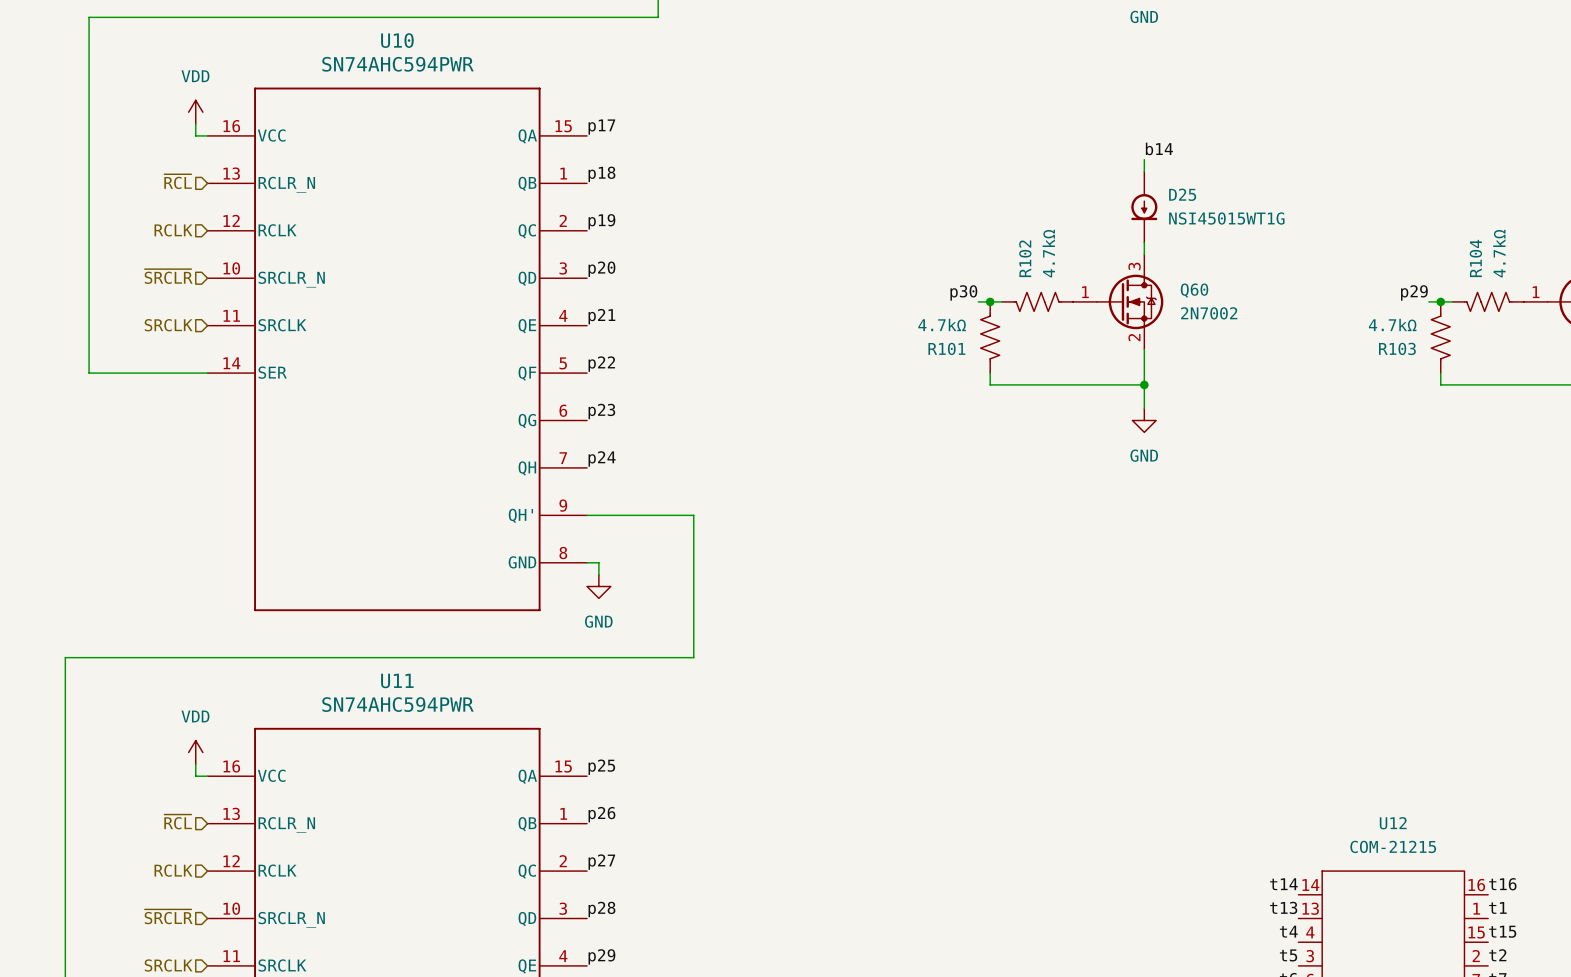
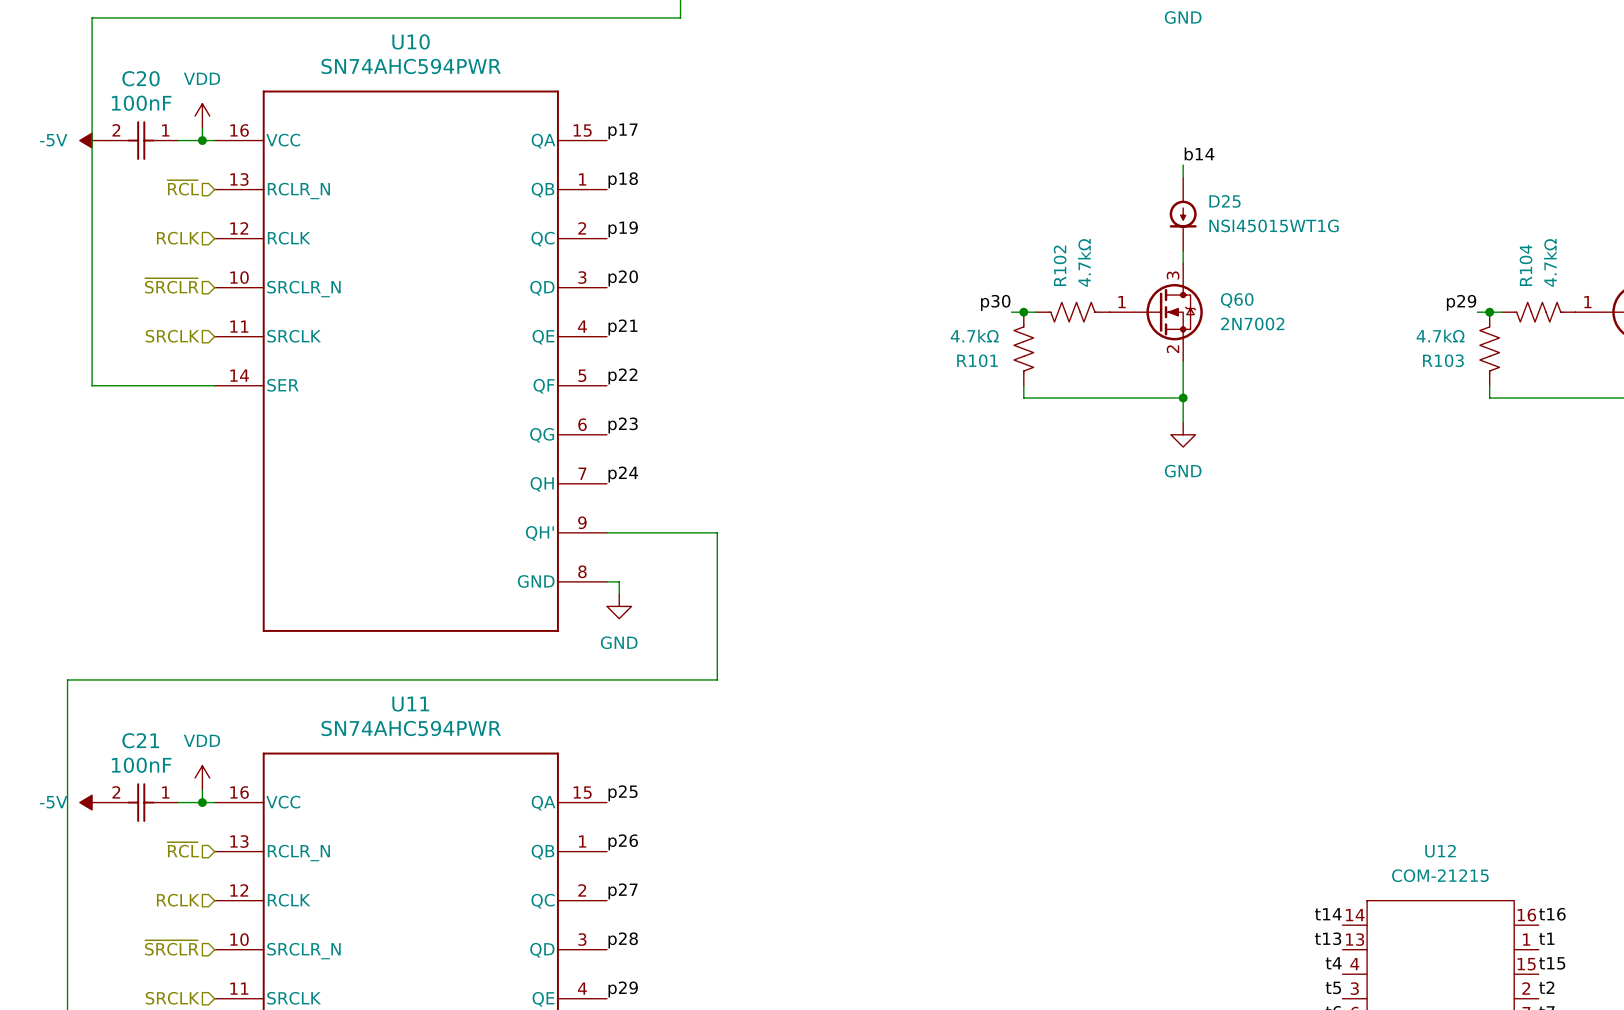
power symbol: none -> -5V (92, 140)
C20: none -> 100nF (141, 140)
wire: none -> (177, 140) (202, 140)
junction: none -> (202, 140)
power symbol: none -> -5V (92, 802)
C21: none -> 100nF (141, 802)
wire: none -> (177, 802) (202, 802)
junction: none -> (202, 802)

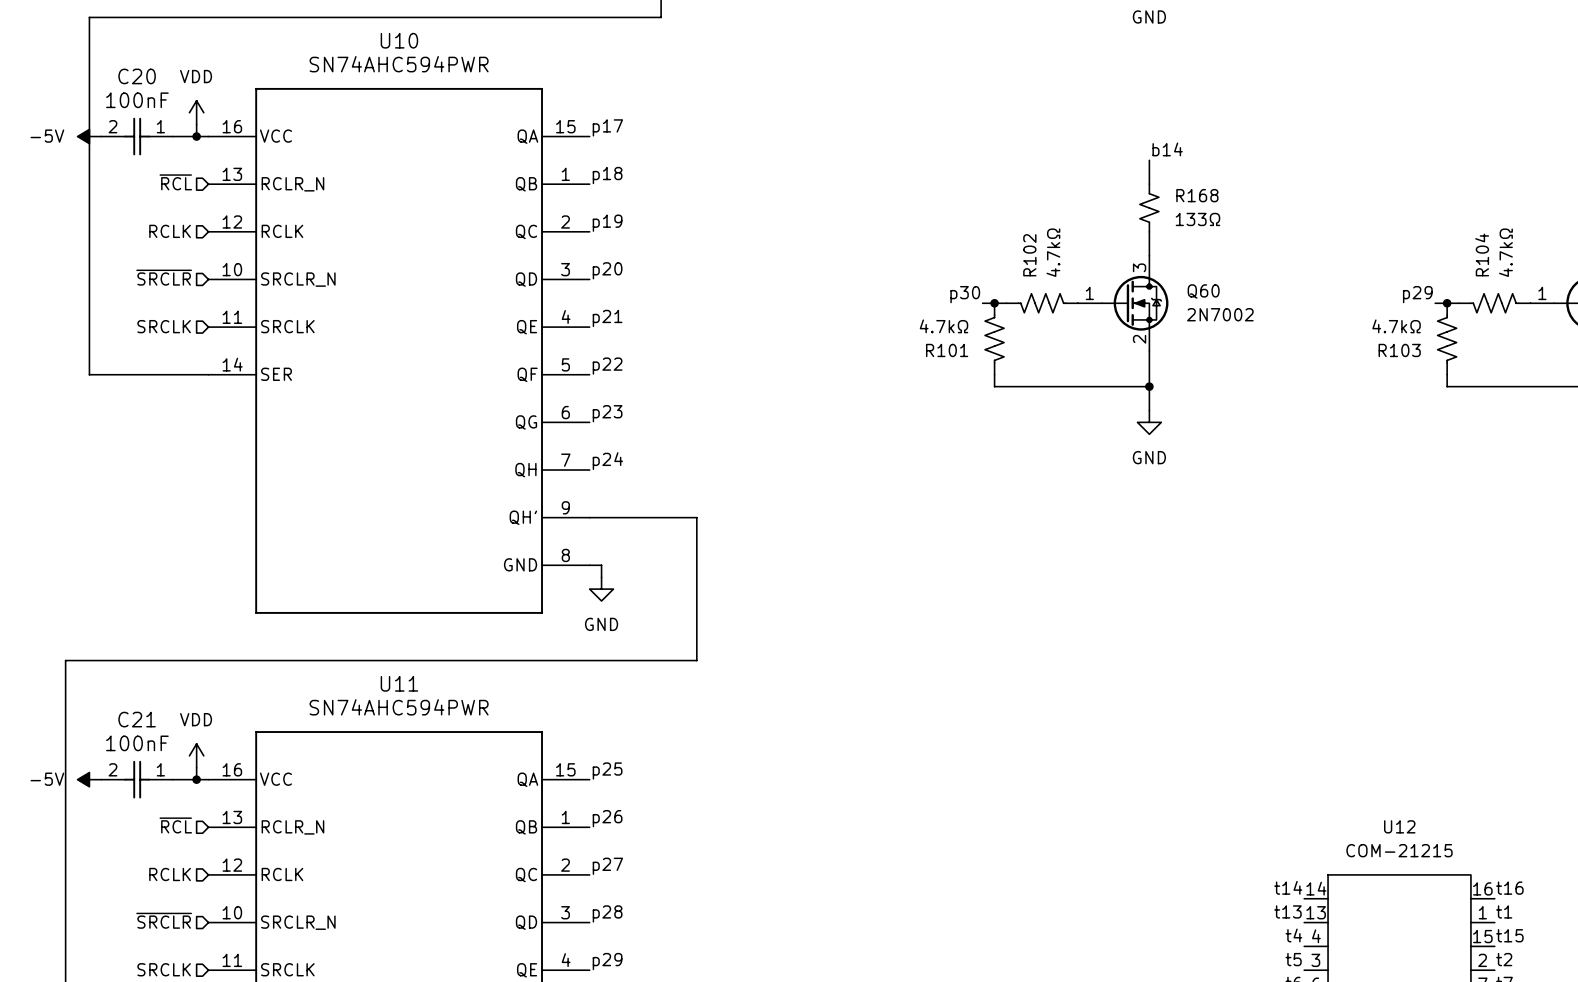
D25: NSI45015WT1G (1183, 214) -> none
R168: none -> 133Ω (1149, 207)

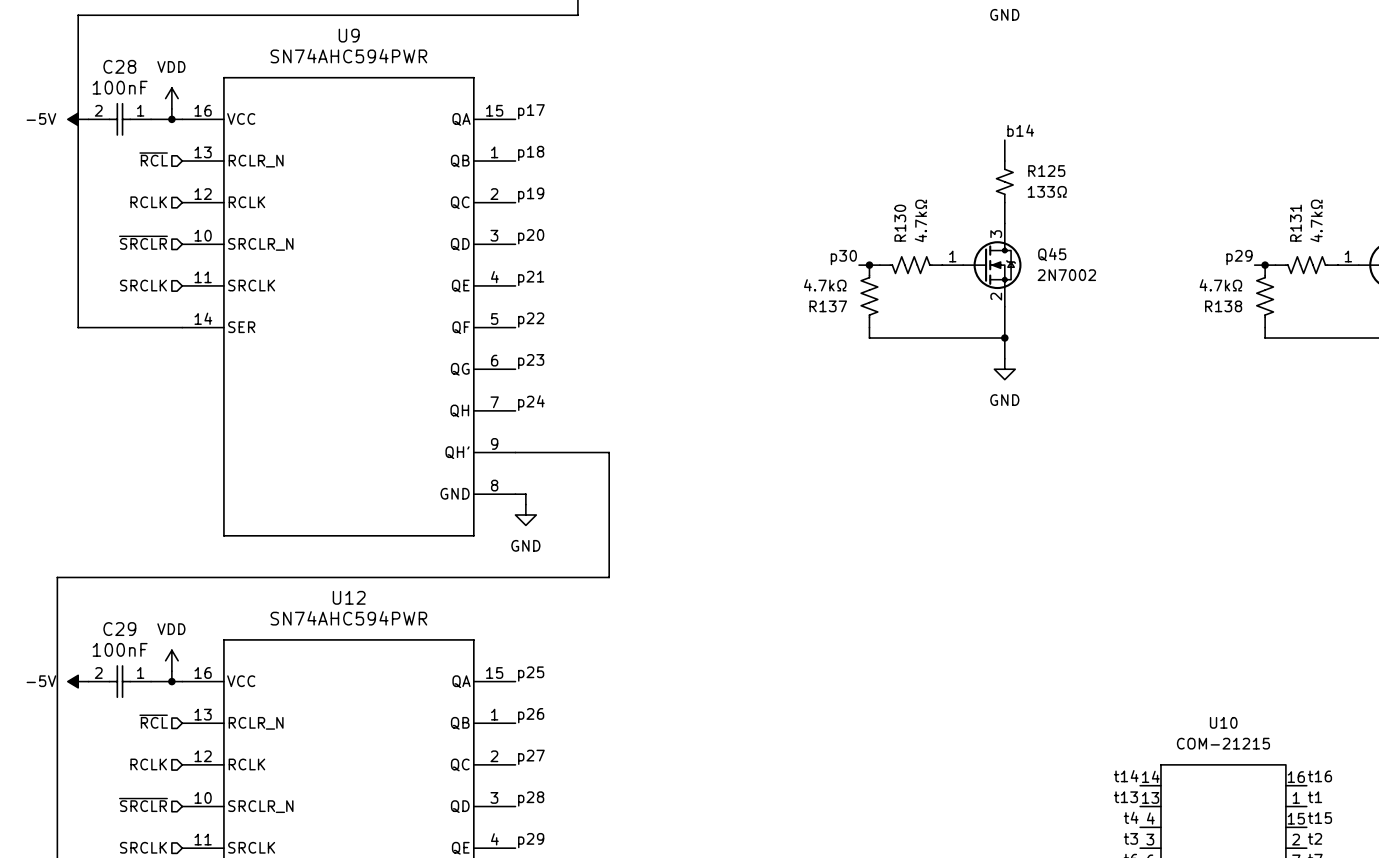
U10 name: U10 (399, 40) -> U9 (349, 35)
C20 name: C20 (137, 76) -> C28 (119, 66)
R168 name: R168 (1197, 195) -> R125 (1046, 171)
R104 name: R104 (1482, 254) -> R131 (1295, 223)
R102 name: R102 (1029, 255) -> R130 (900, 223)
Q60 name: Q60 (1203, 291) -> Q45 (1052, 254)
R101 name: R101 (947, 350) -> R137 (828, 306)
R103 name: R103 (1399, 350) -> R138 (1223, 306)
U11 name: U11 (399, 683) -> U12 (349, 597)
C21 name: C21 (137, 719) -> C29 (119, 629)
U12 name: U12 (1399, 826) -> U10 (1223, 722)
label: t5 (1293, 959) -> t3 (1130, 838)

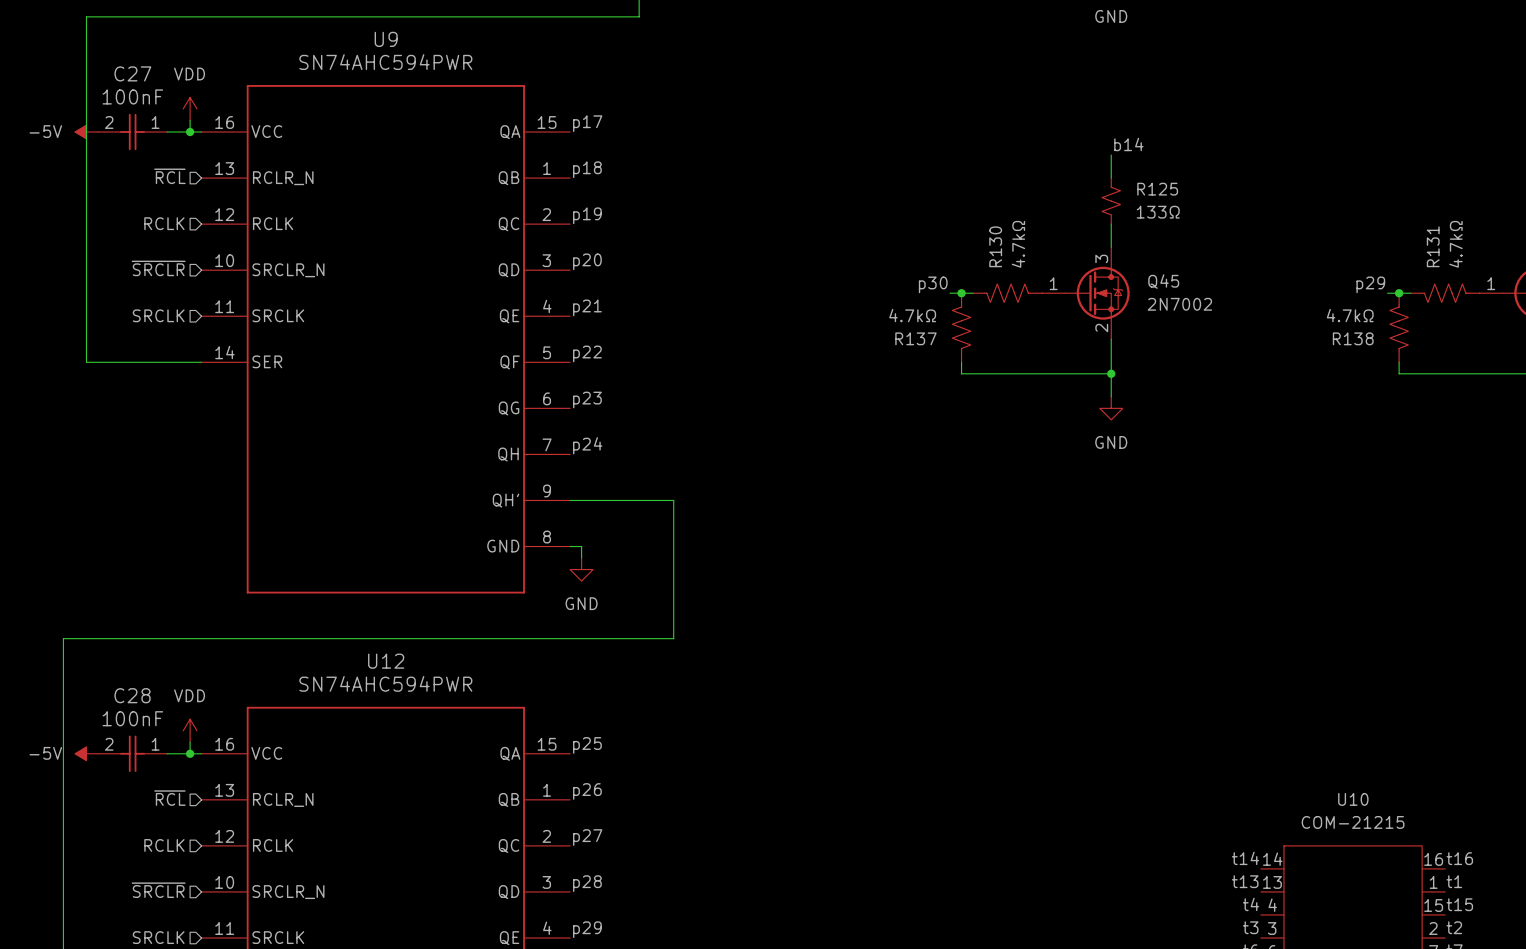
C28 name: C28 (119, 66) -> C27 (132, 73)
C29 name: C29 (119, 629) -> C28 (132, 695)

